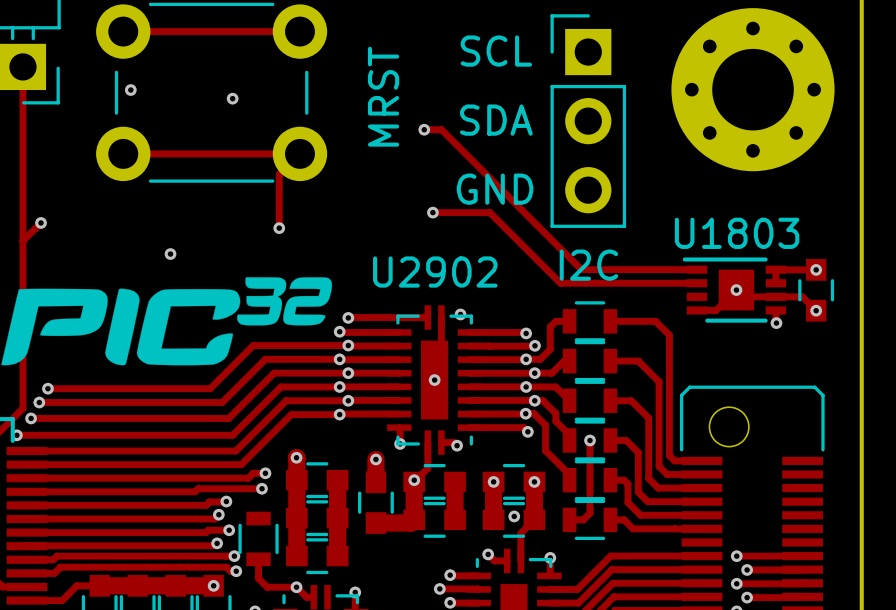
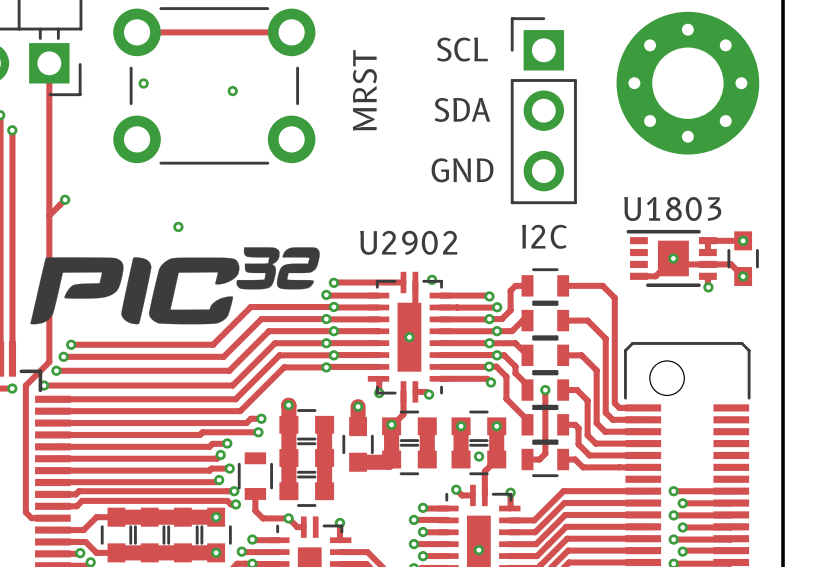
track: (424, 129) (441, 129) (581, 269) (697, 269) -> none
via: (424, 129) -> none
track: (123, 153) (299, 153) (279, 174) (279, 228) -> none
track: (432, 212) (489, 212) (560, 283) (697, 283) -> none
via: (432, 212) -> none
via: (279, 228) -> none

